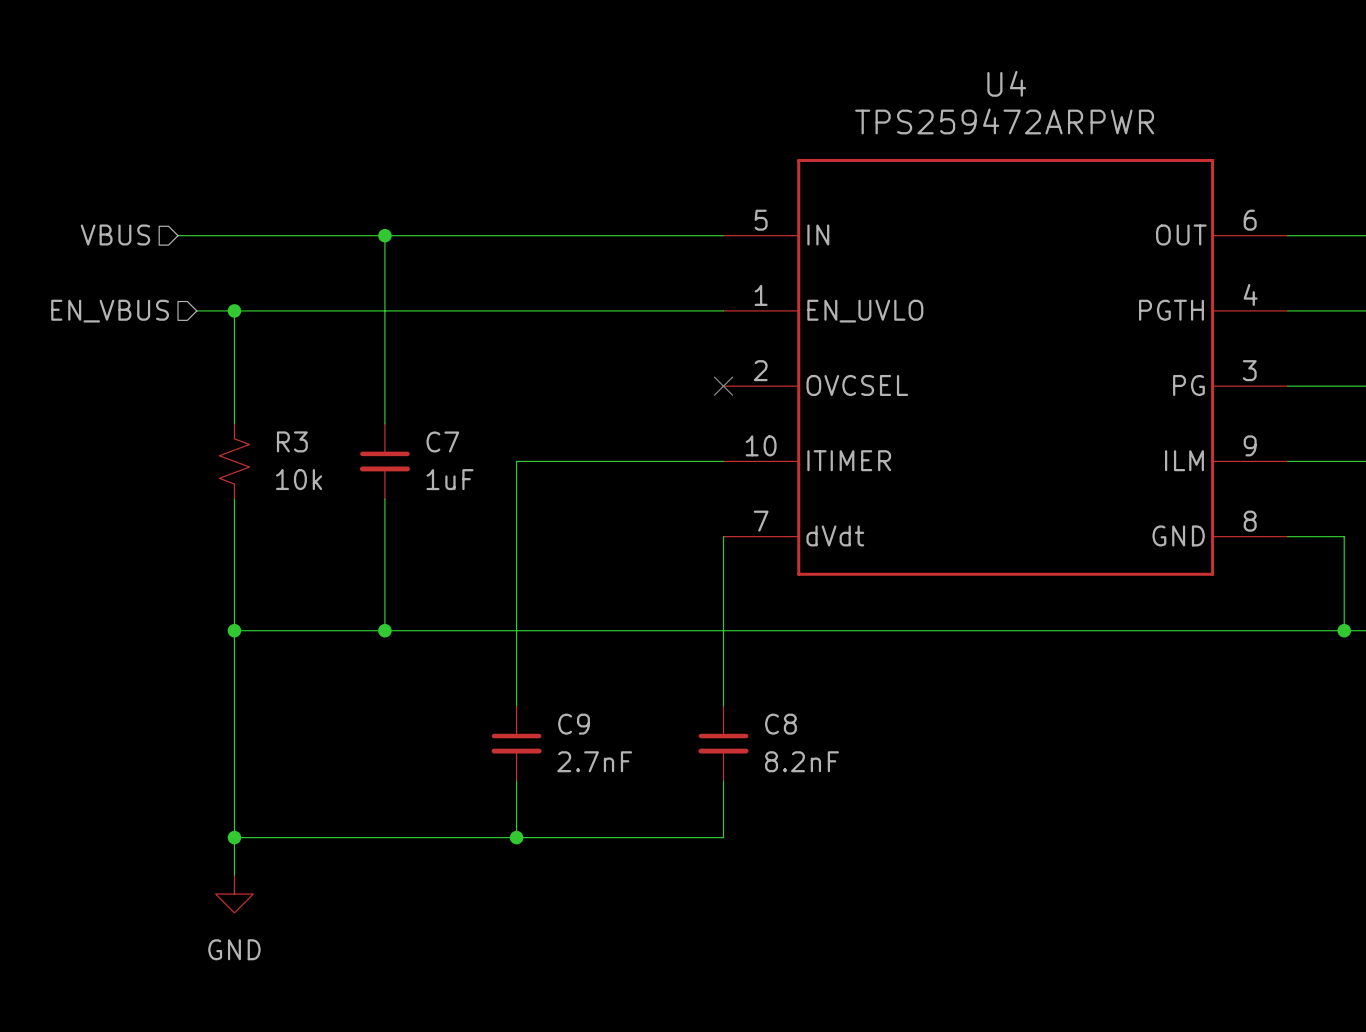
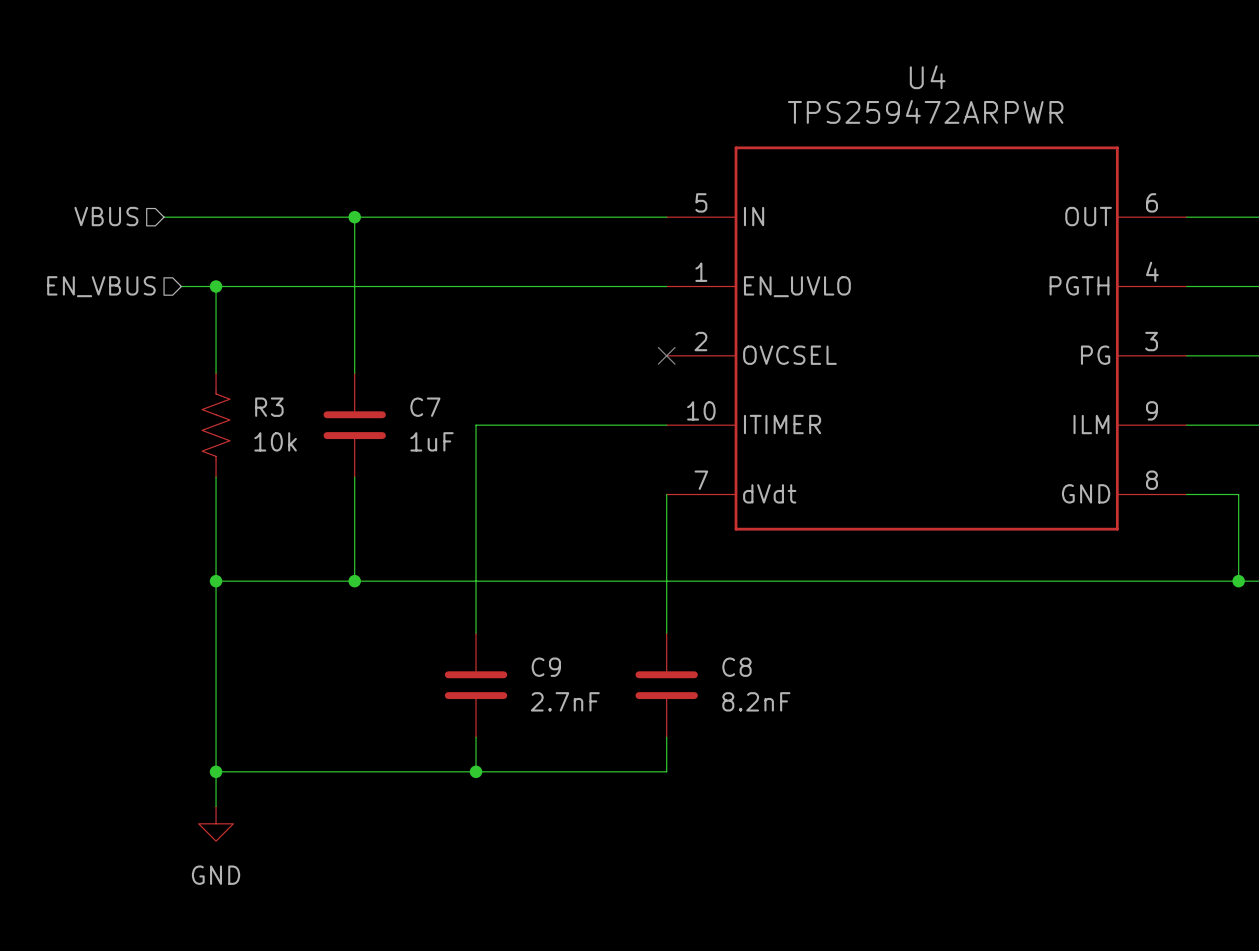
R3 symbol: [219, 423, 250, 500] -> [202, 373, 230, 478]
C7 symbol: [359, 423, 410, 500] -> [323, 373, 386, 478]
C9 symbol: [491, 705, 542, 782] -> [444, 633, 508, 738]
C8 symbol: [698, 705, 749, 782] -> [635, 633, 698, 738]

